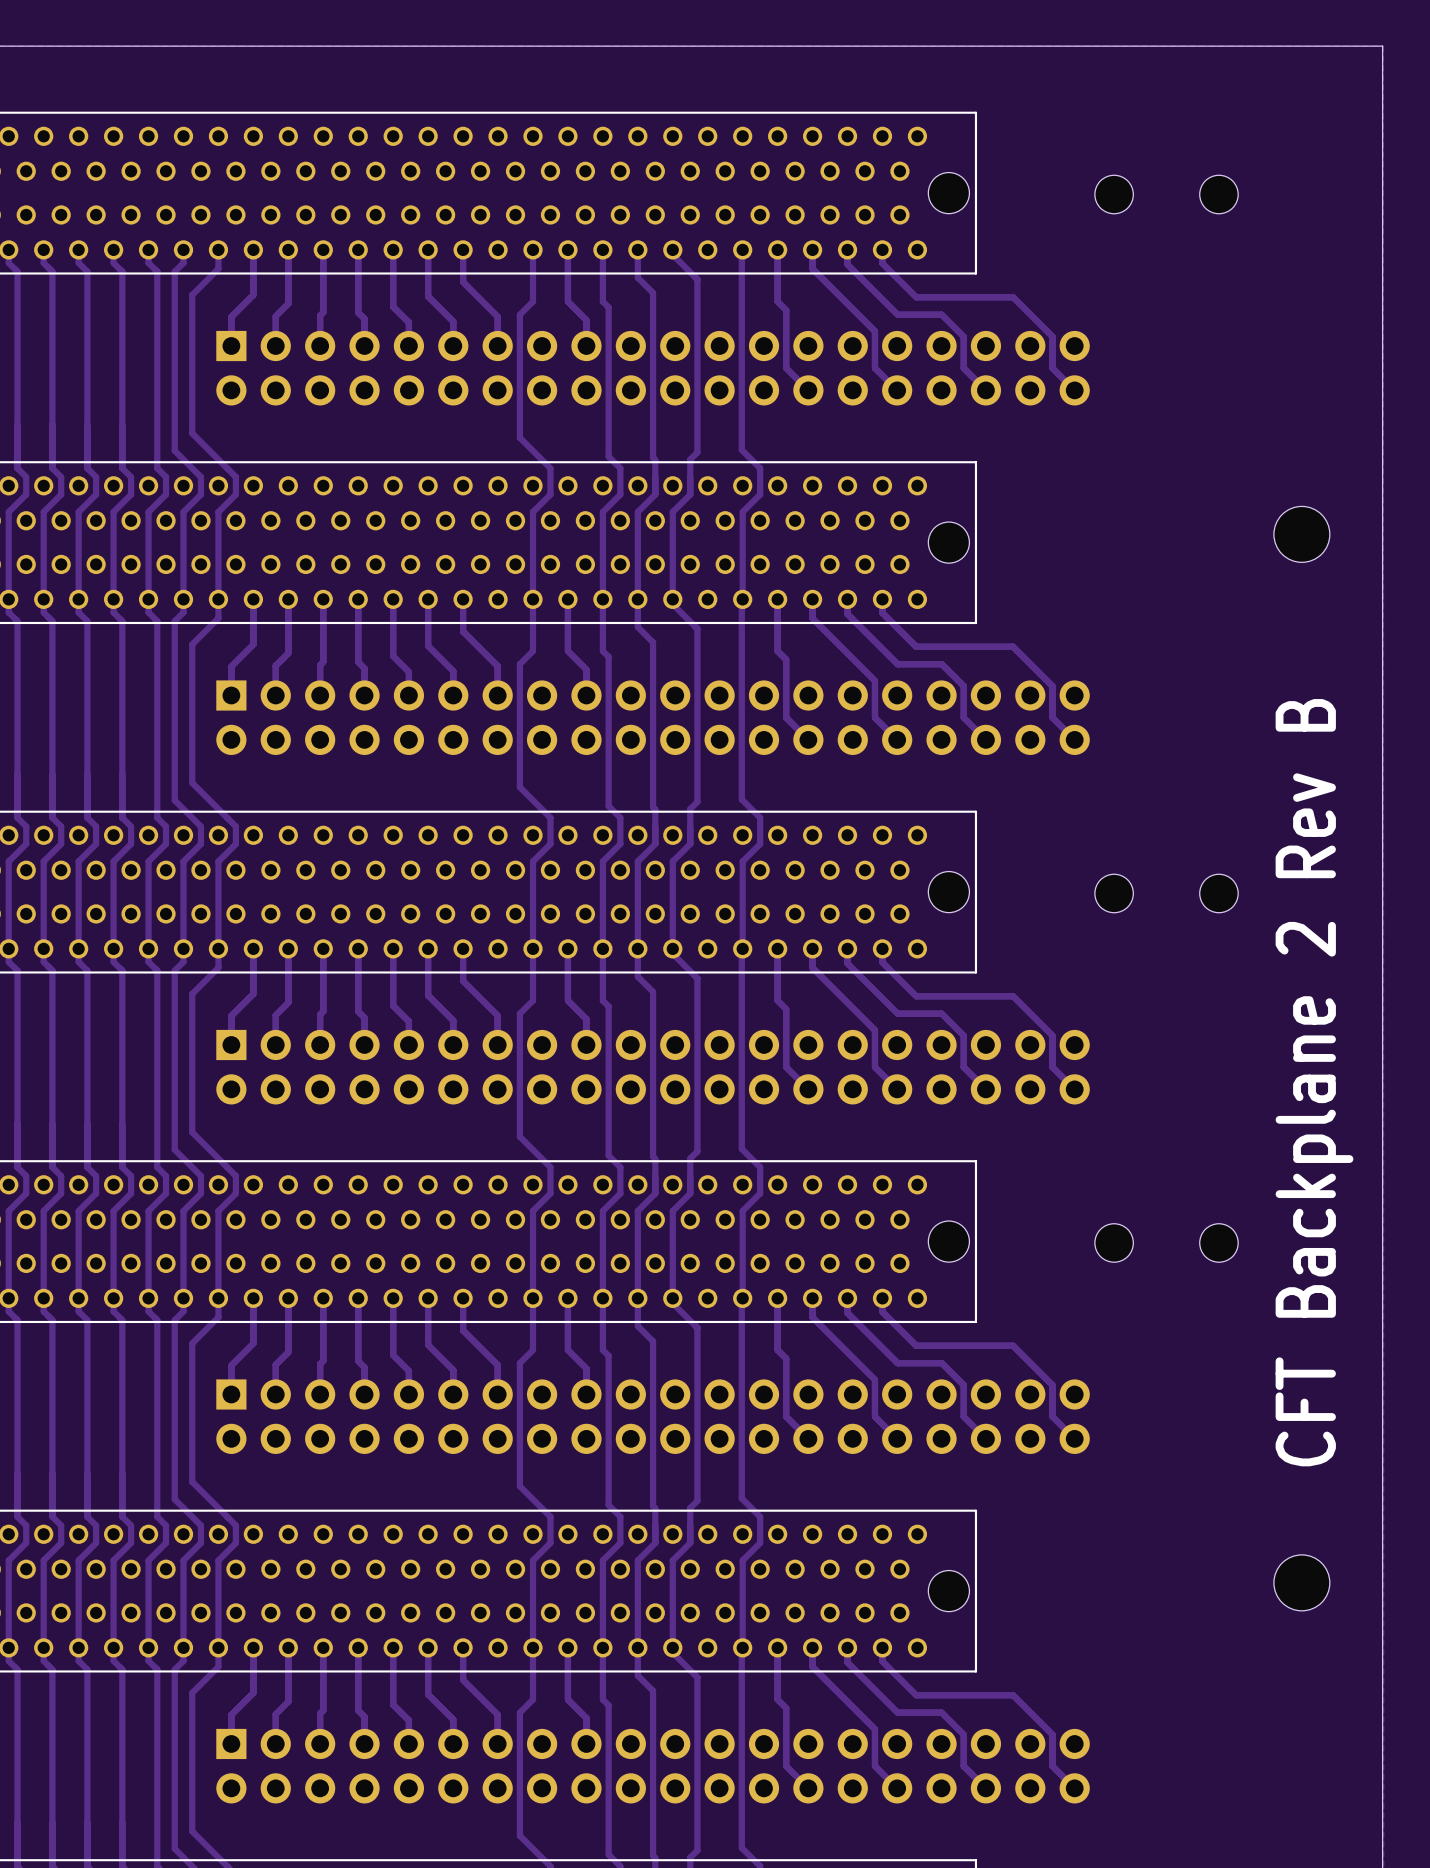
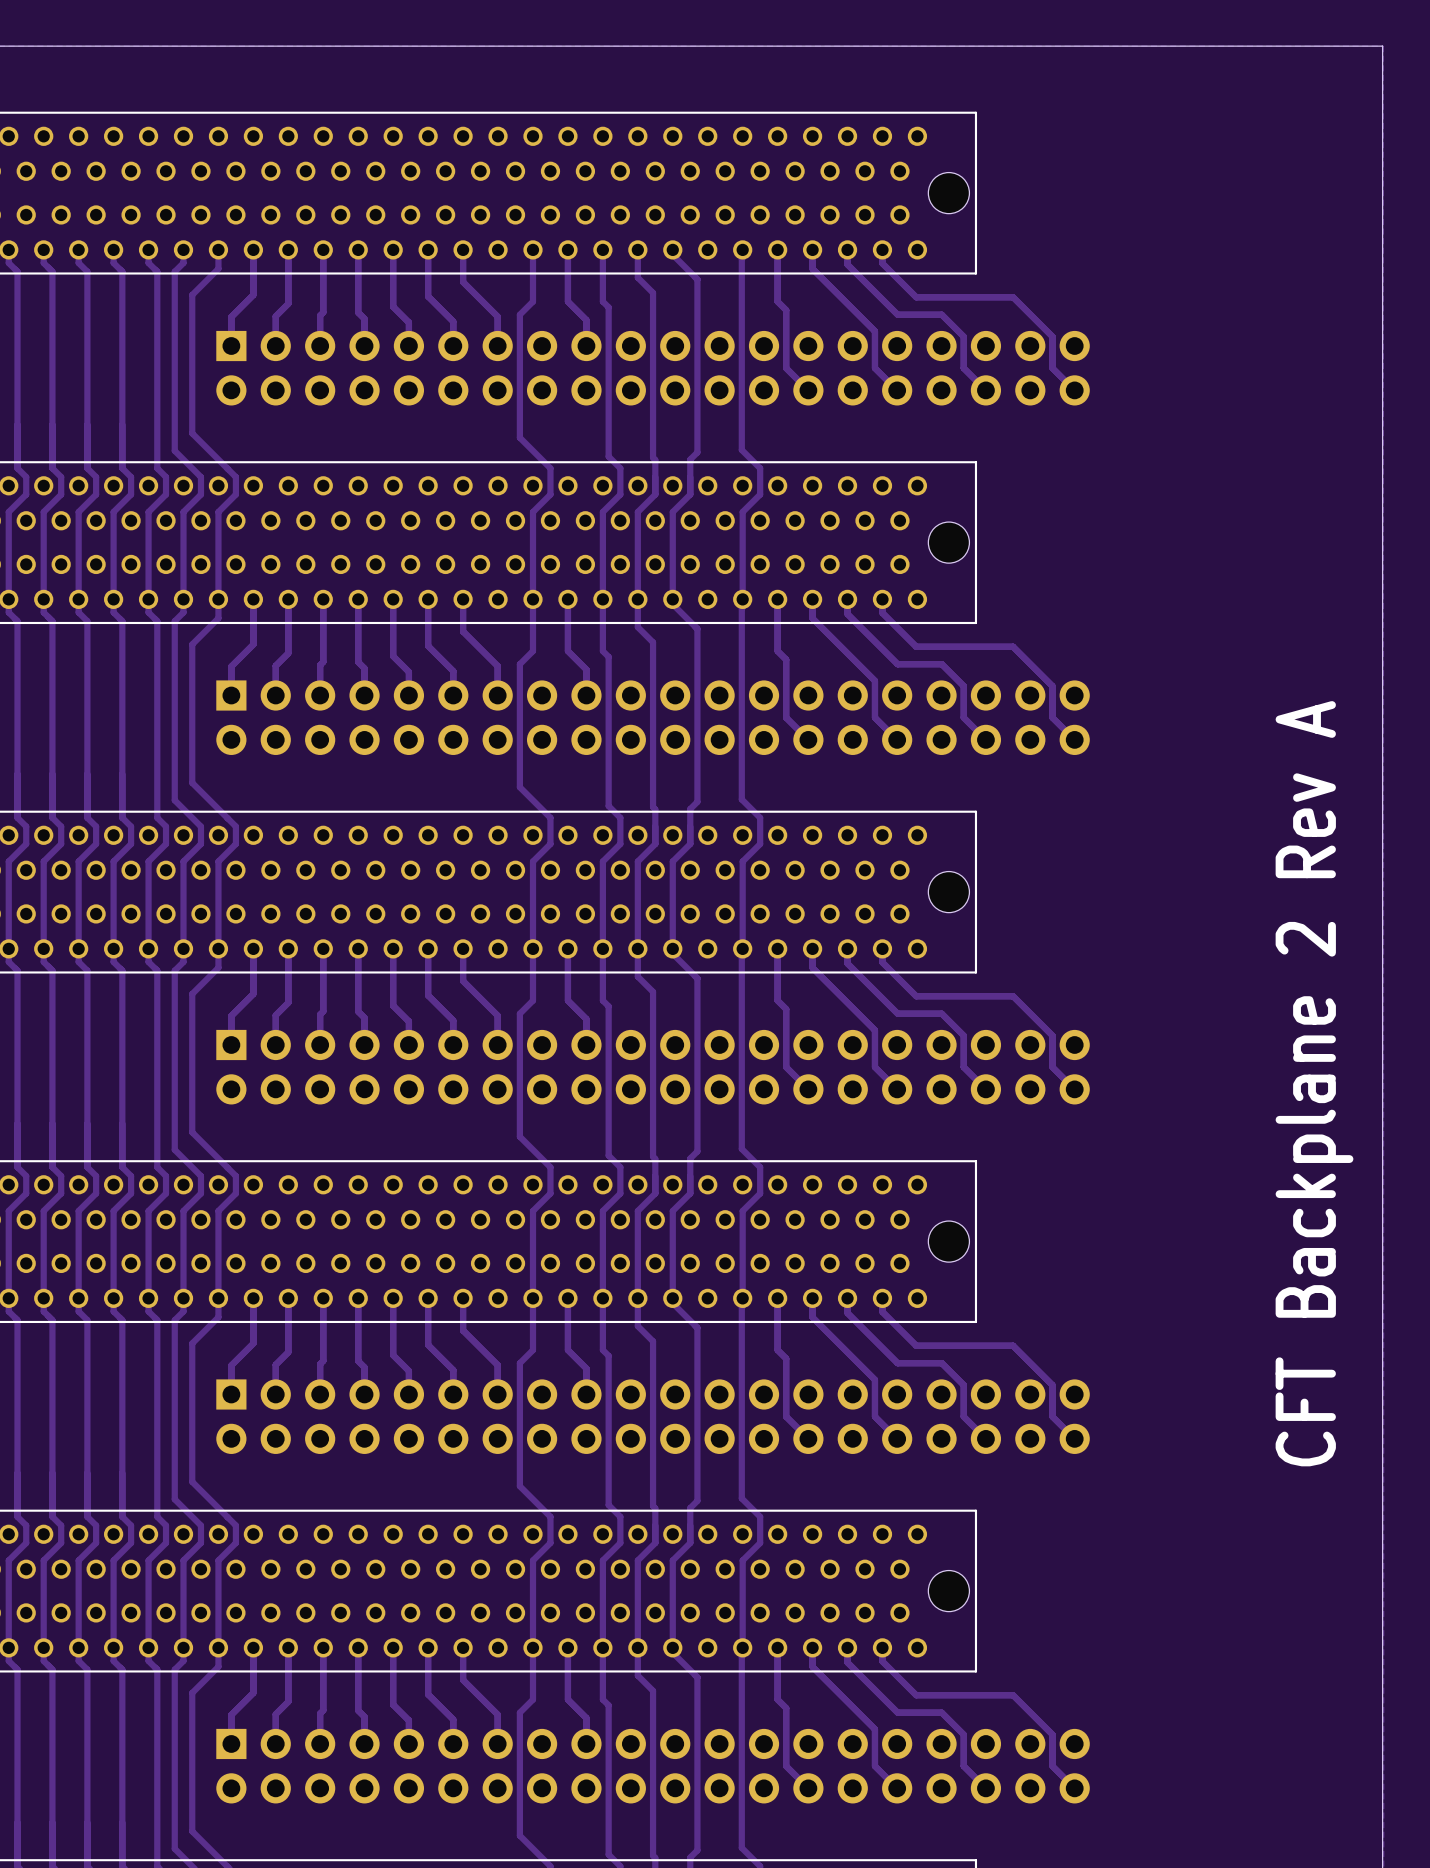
part: (1114, 194) -> none
part: (1218, 194) -> none
part: (1301, 534) -> none
part: (1114, 893) -> none
part: (1218, 893) -> none
text: CFT Backplane 2 Rev B (1314, 1082) -> CFT Backplane 2 Rev A (1314, 1083)
part: (1114, 1242) -> none
part: (1218, 1242) -> none
part: (1301, 1582) -> none

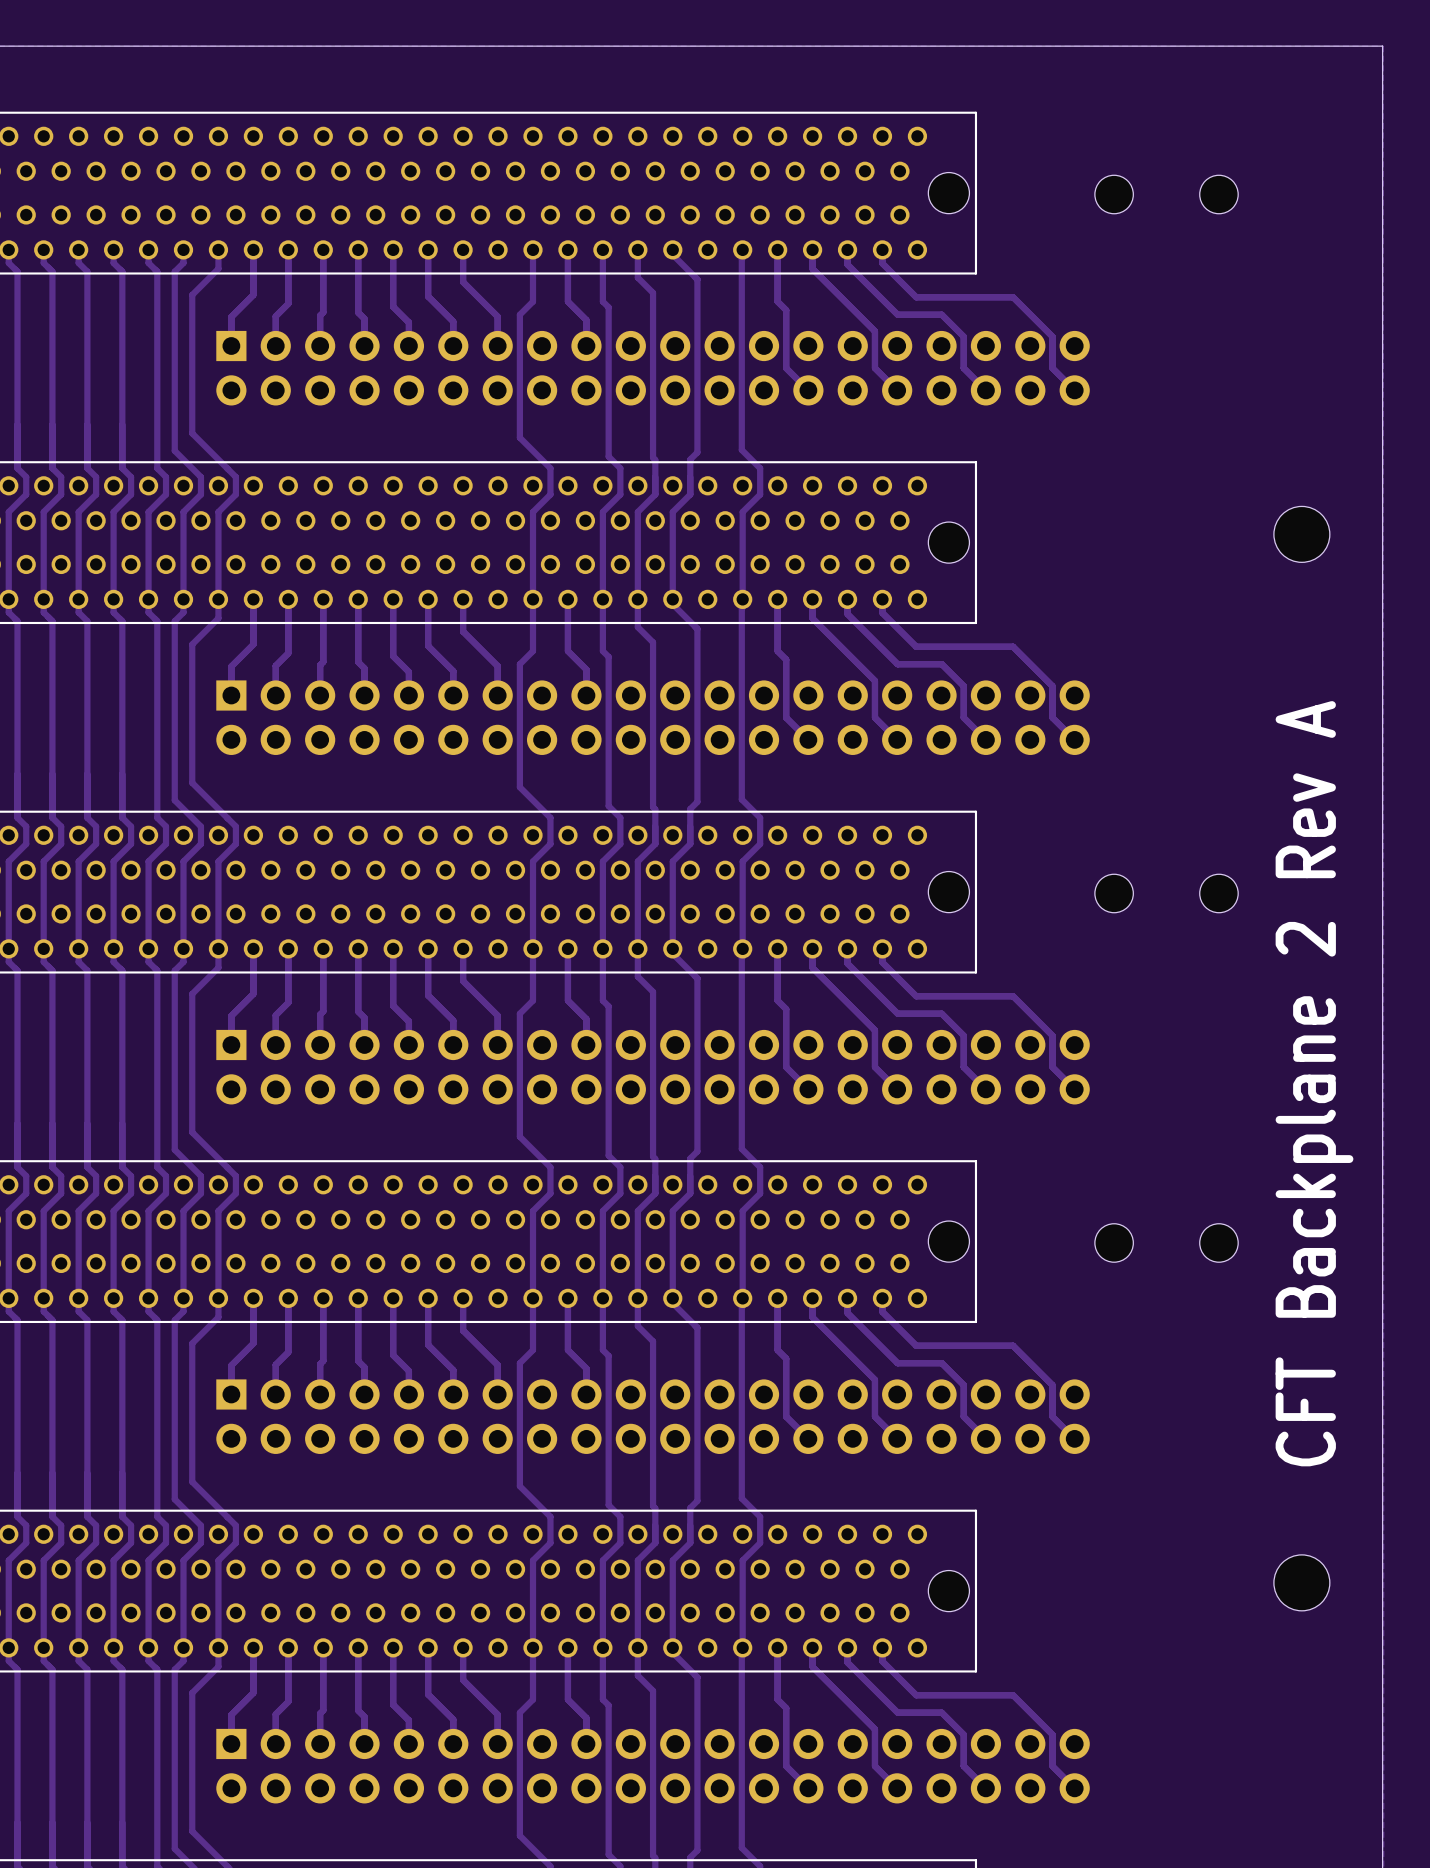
part: none -> (1114, 194)
part: none -> (1218, 194)
part: none -> (1301, 534)
part: none -> (1114, 893)
part: none -> (1218, 893)
part: none -> (1114, 1242)
part: none -> (1218, 1242)
part: none -> (1301, 1582)

